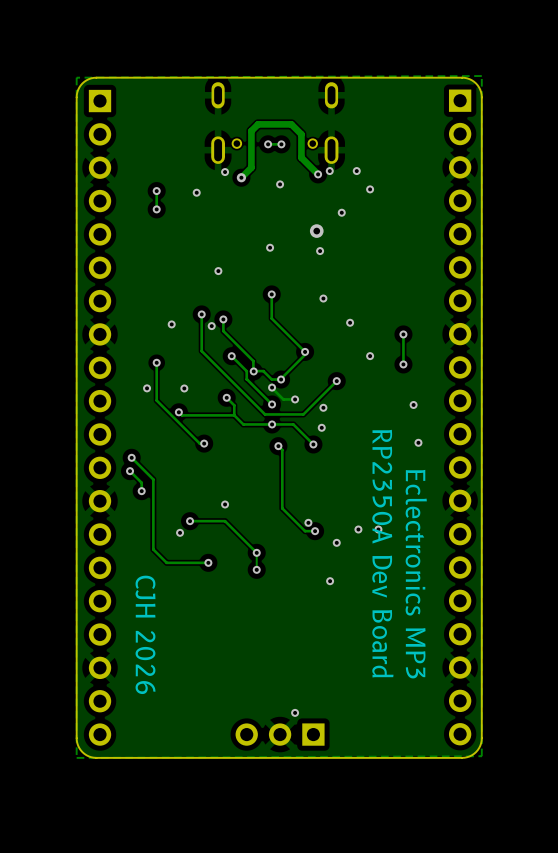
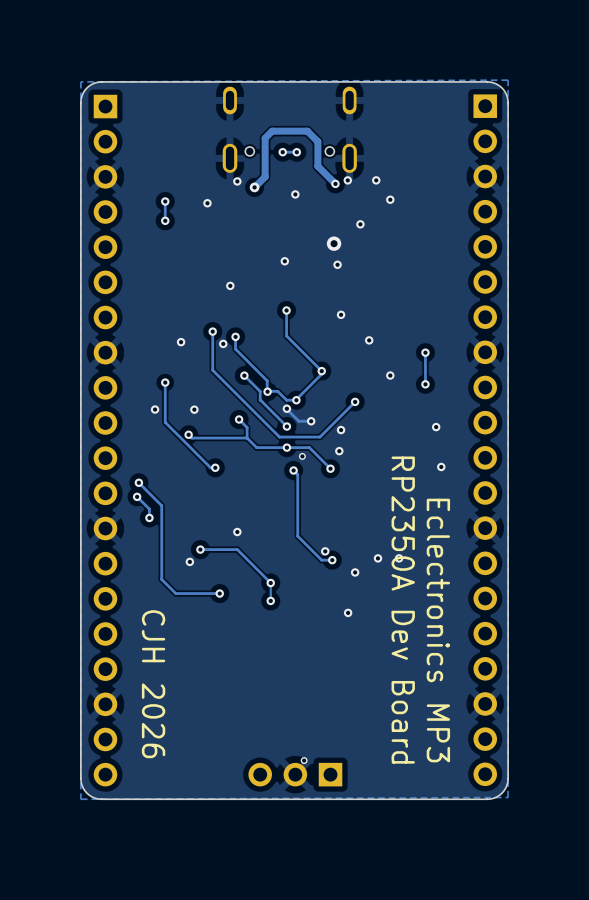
via: none -> (302, 456)
via: (295, 712) -> none
via: none -> (304, 760)

